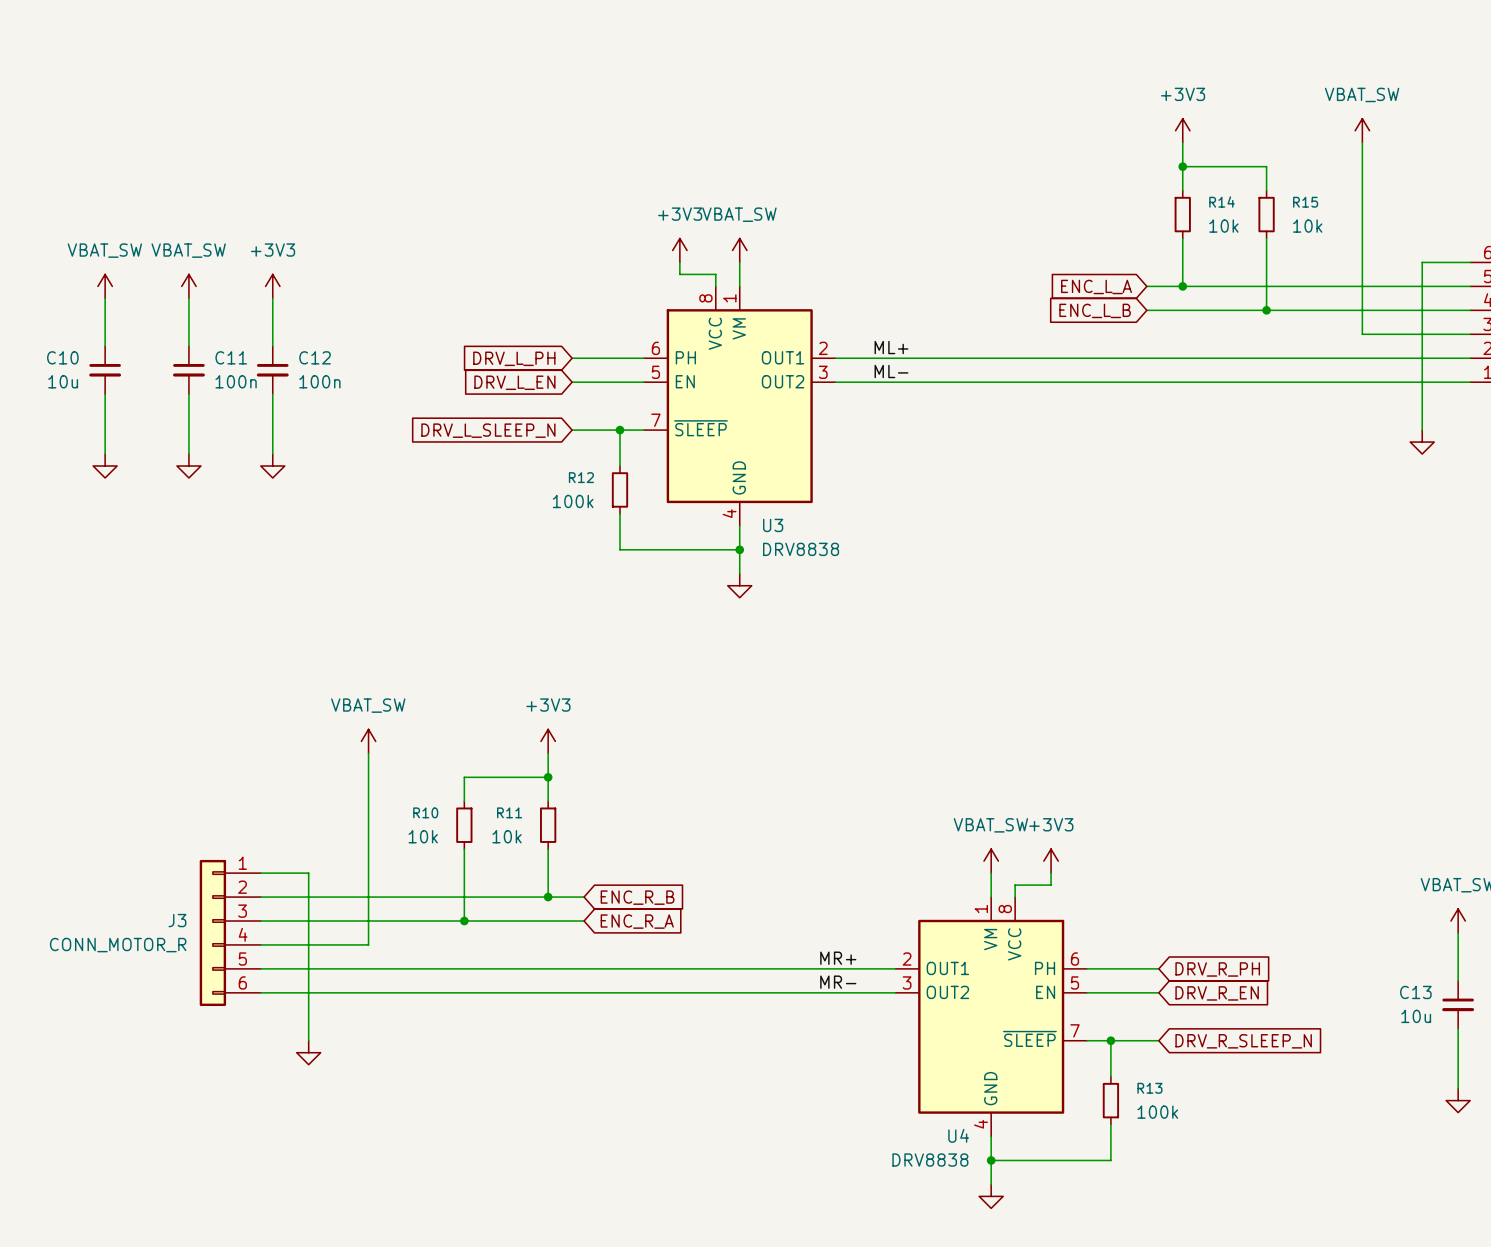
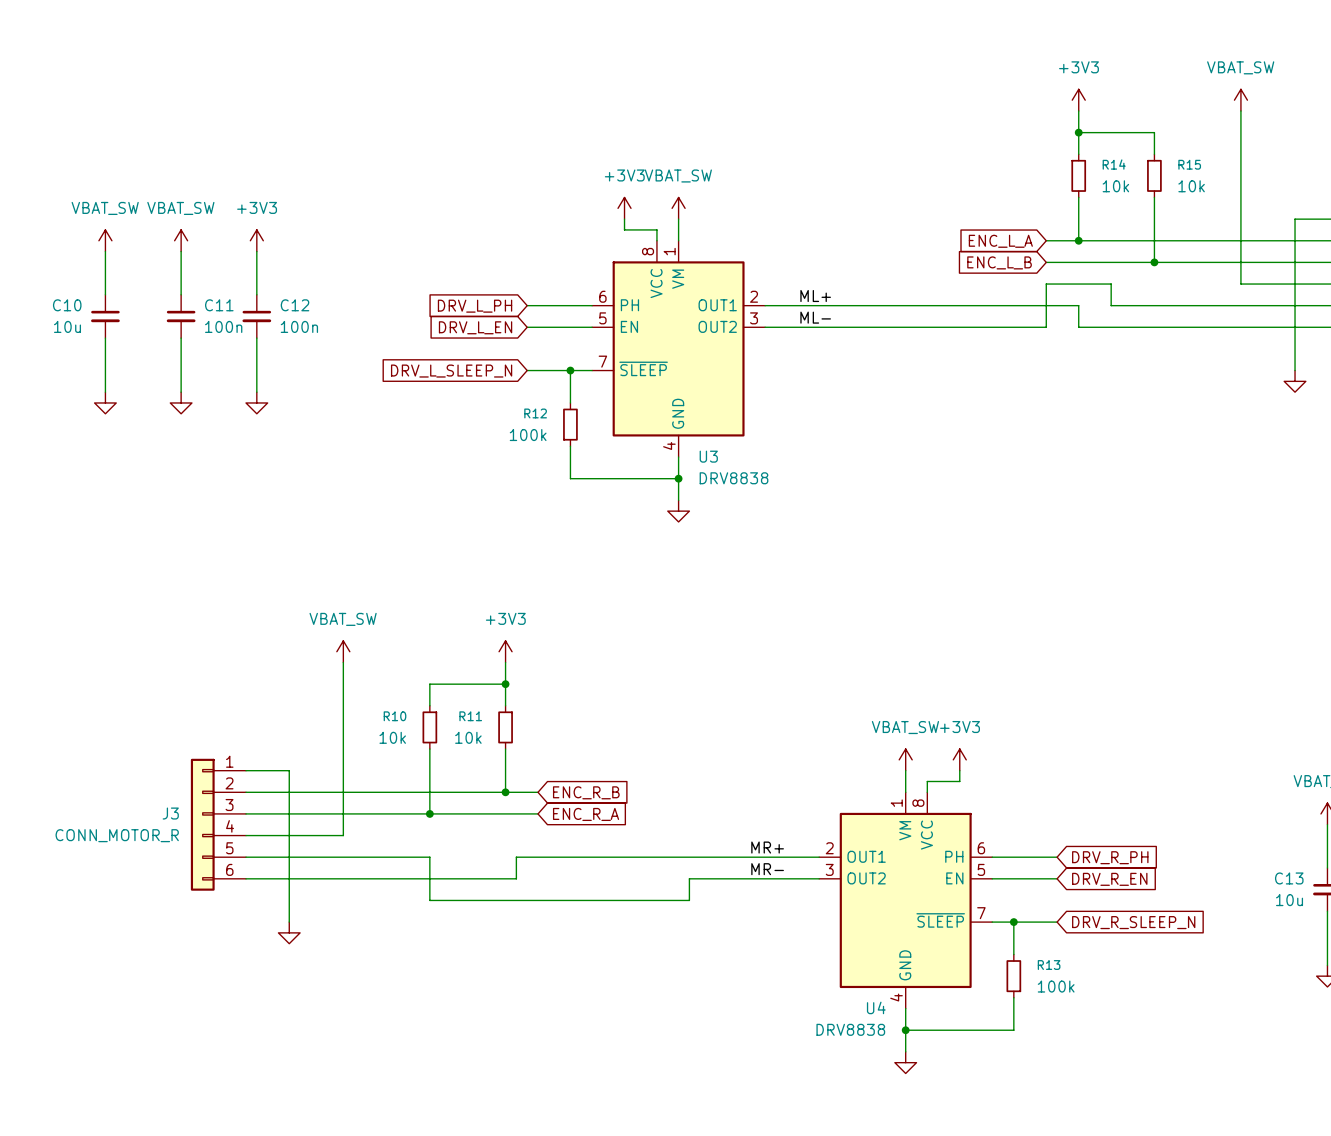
wire: (1182, 358) (1218, 358) -> (1078, 305) (1078, 327)
wire: (1146, 382) (1182, 382) -> (1046, 327) (1046, 284) (1111, 284) (1111, 305)
wire: (464, 968) (560, 968) -> (516, 878) (516, 857)
wire: (560, 992) (751, 992) -> (429, 857) (429, 900) (689, 900) (689, 878)

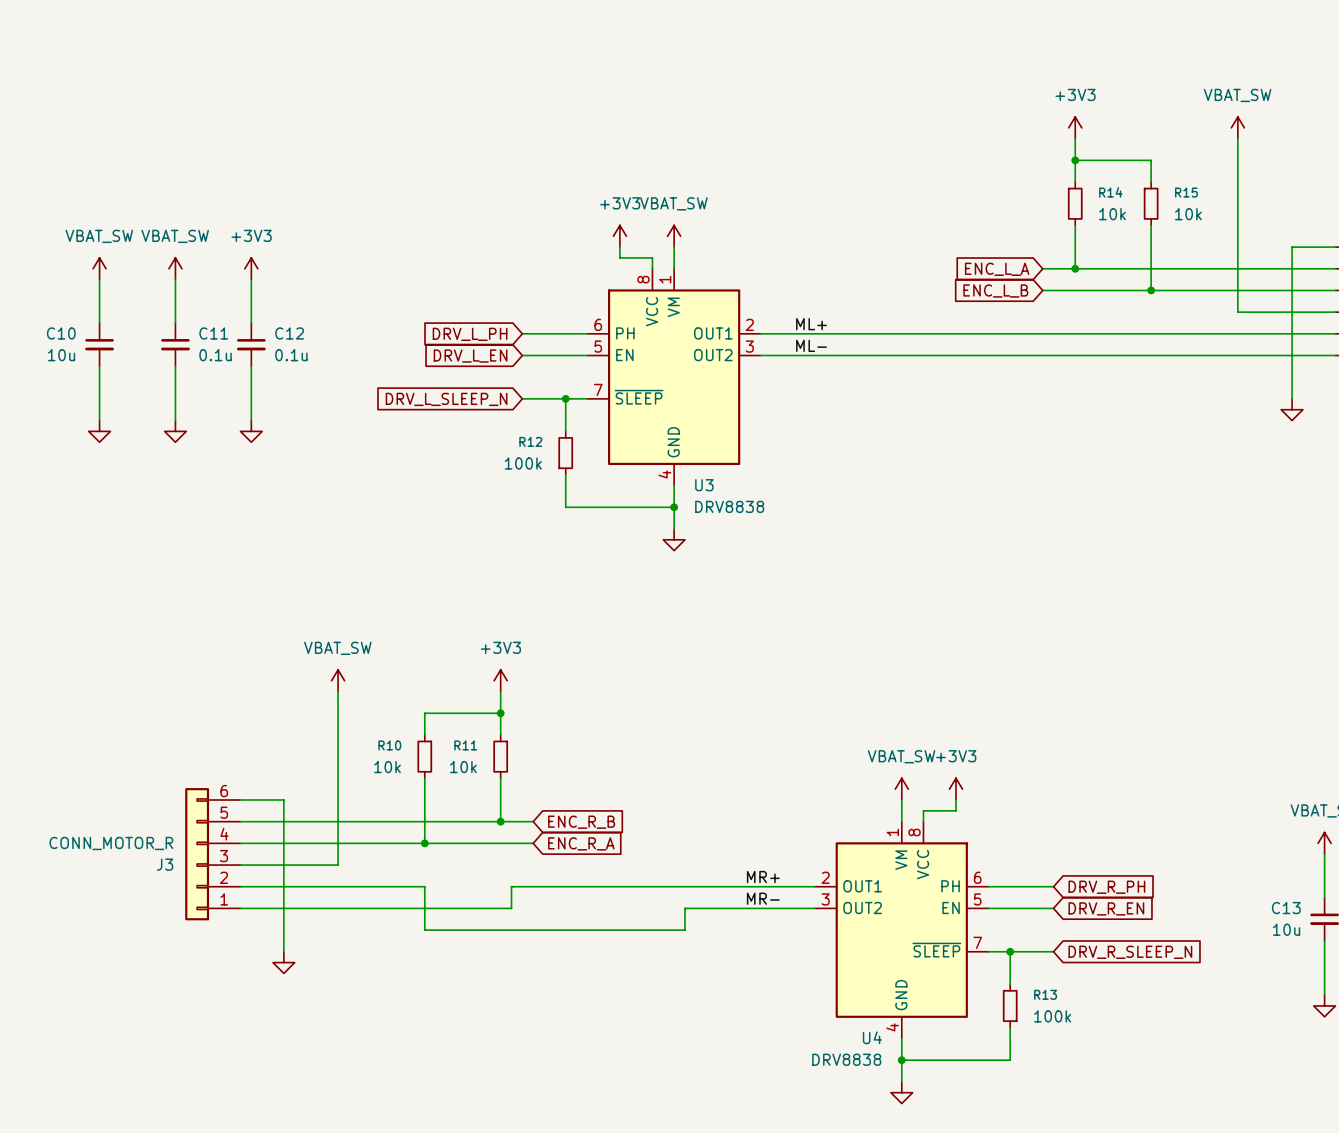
wire: (1078, 305) (1078, 327) -> (1075, 333) (1107, 333)
wire: (1111, 305) (1111, 284) (1046, 284) (1046, 327) -> (1075, 355) (1042, 355)
C11 value: 100n (223, 326) -> 0.1u (215, 355)
C12 value: 100n (299, 326) -> 0.1u (291, 355)
J3 flip: as is (202, 824) -> up-down (197, 854)

